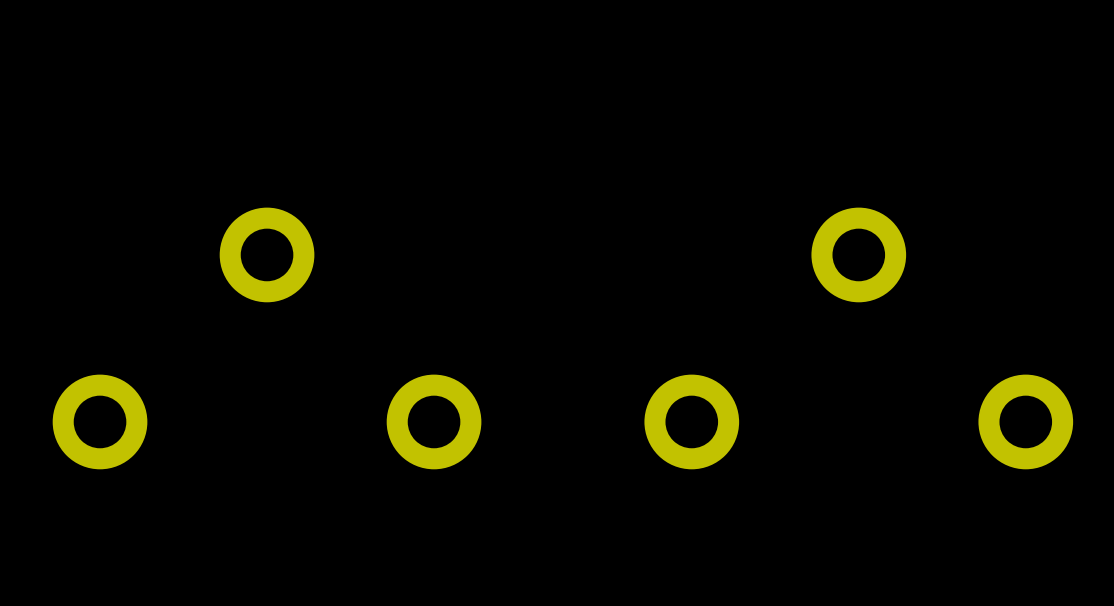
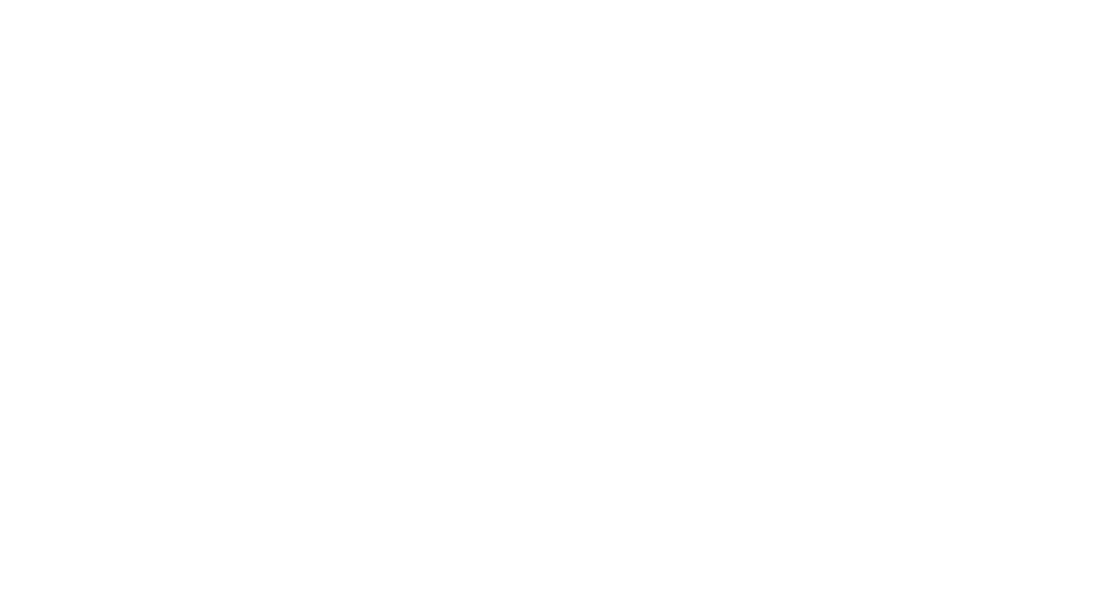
part: (267, 338) -> none
part: (858, 338) -> none

